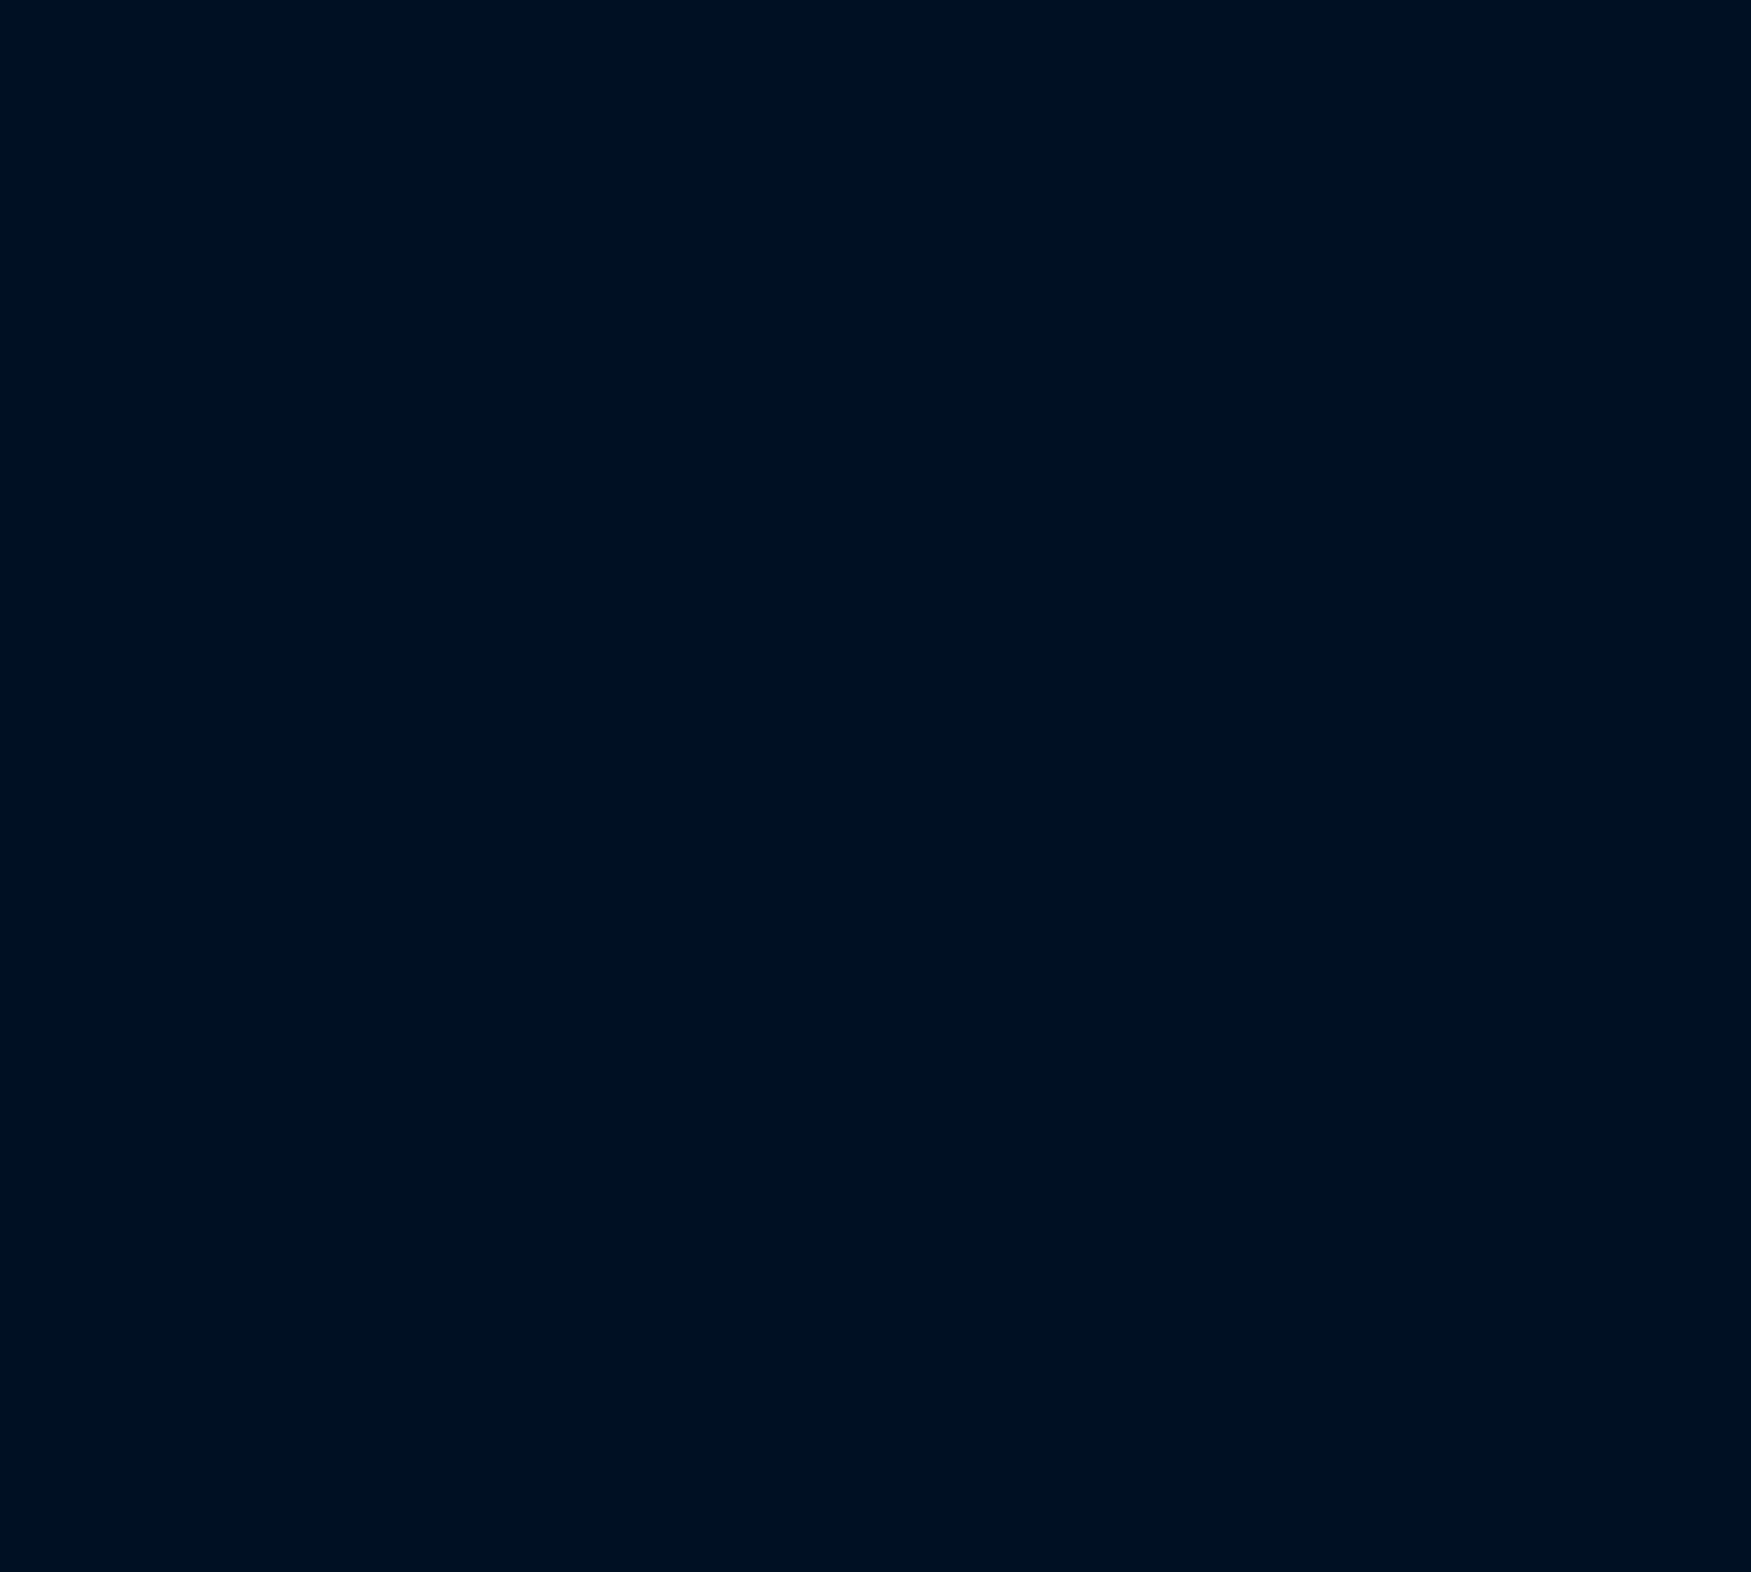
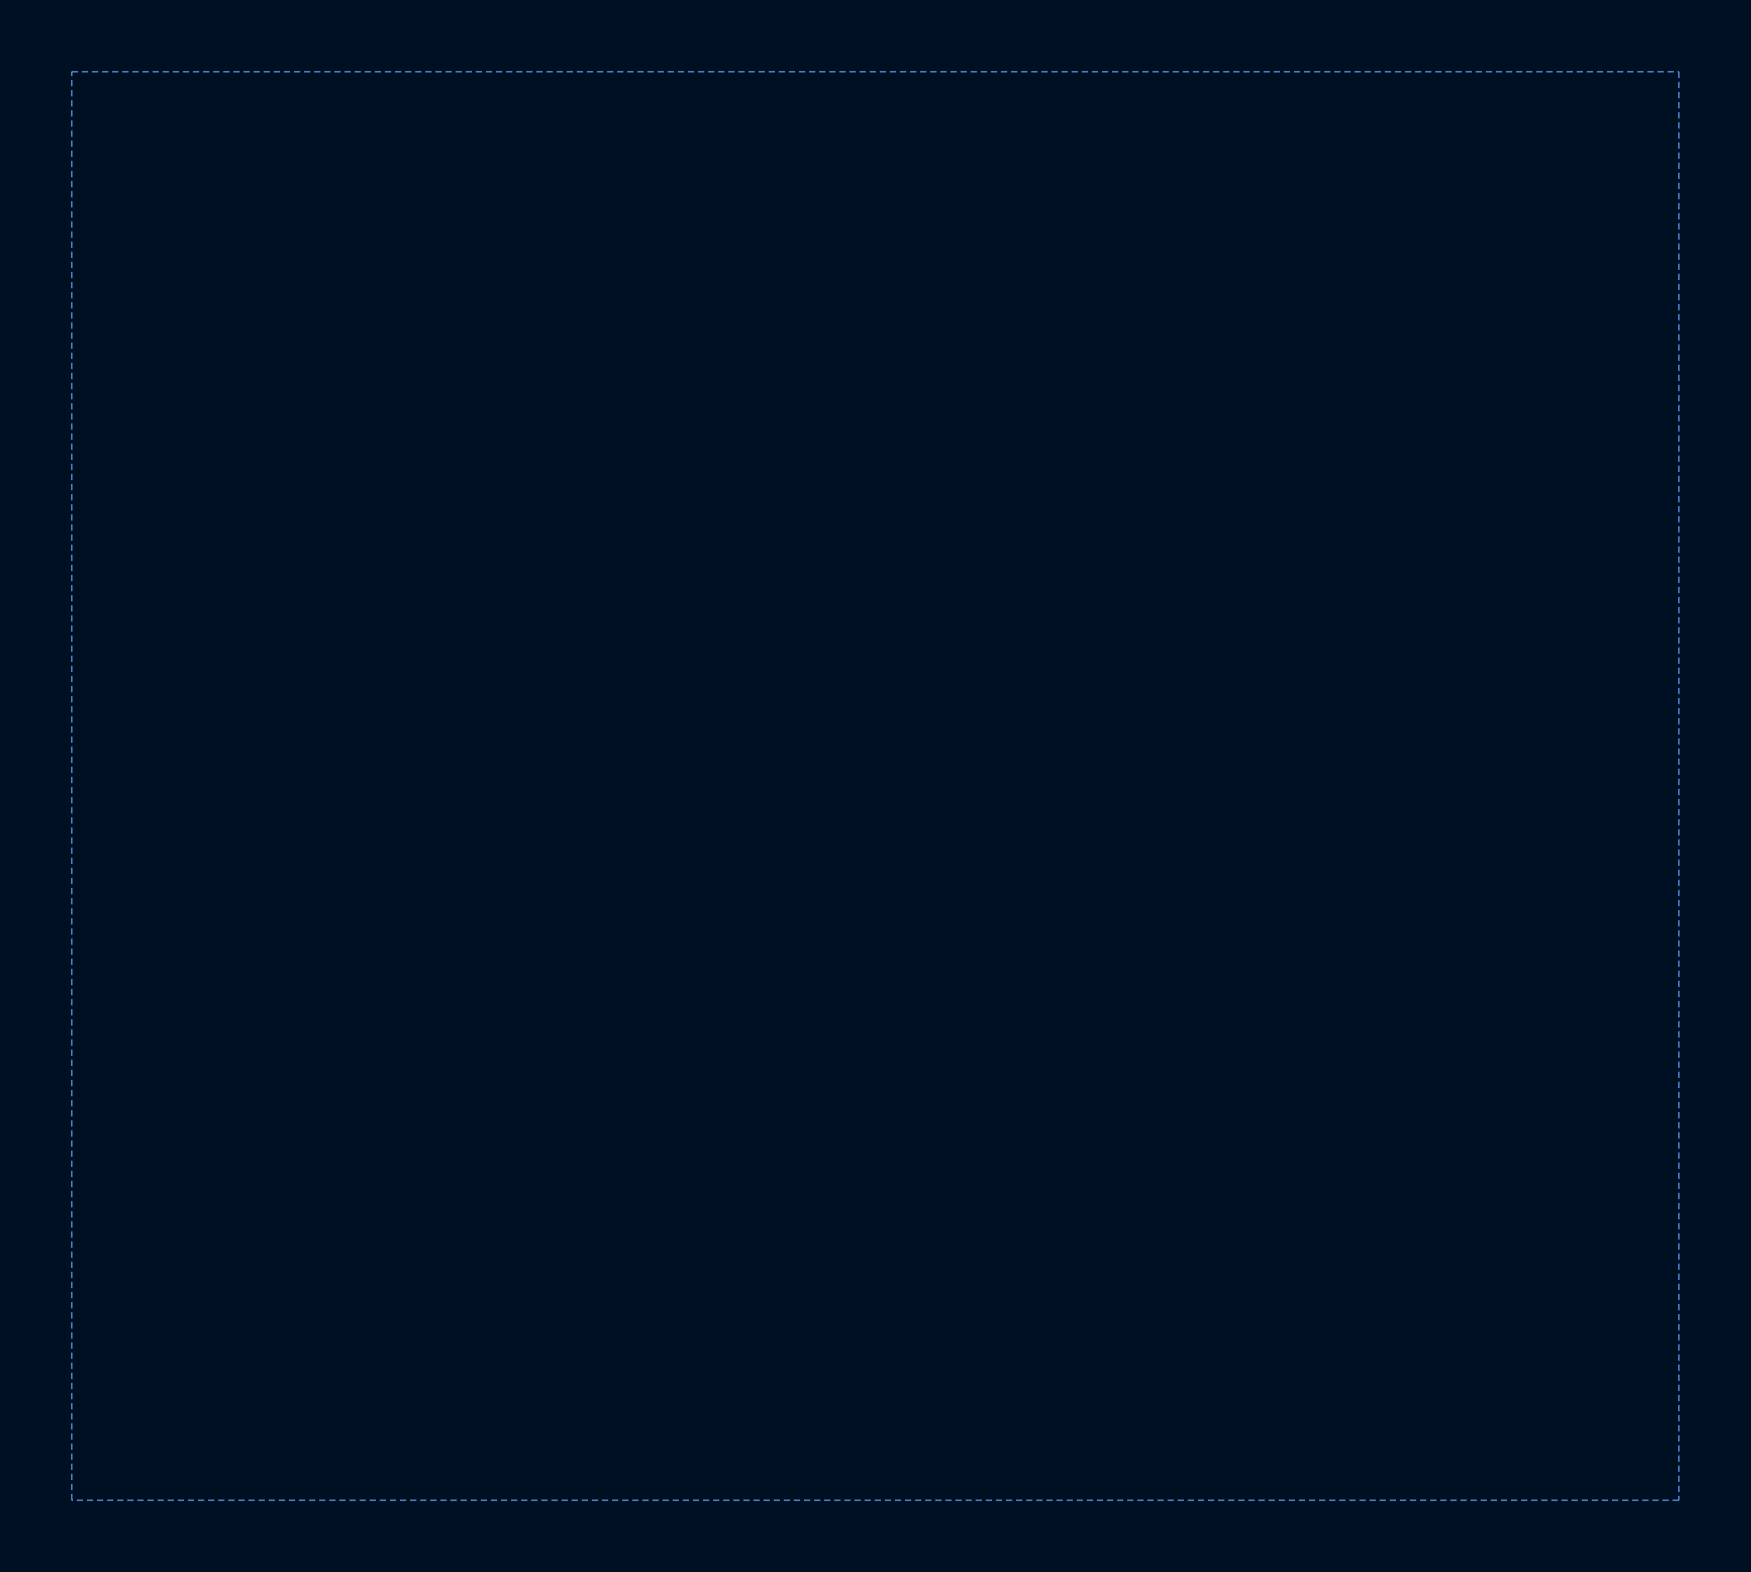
bottom zone outline: none -> (71, 71) (71, 1500) (1678, 1500) (1678, 71) (71, 71)

